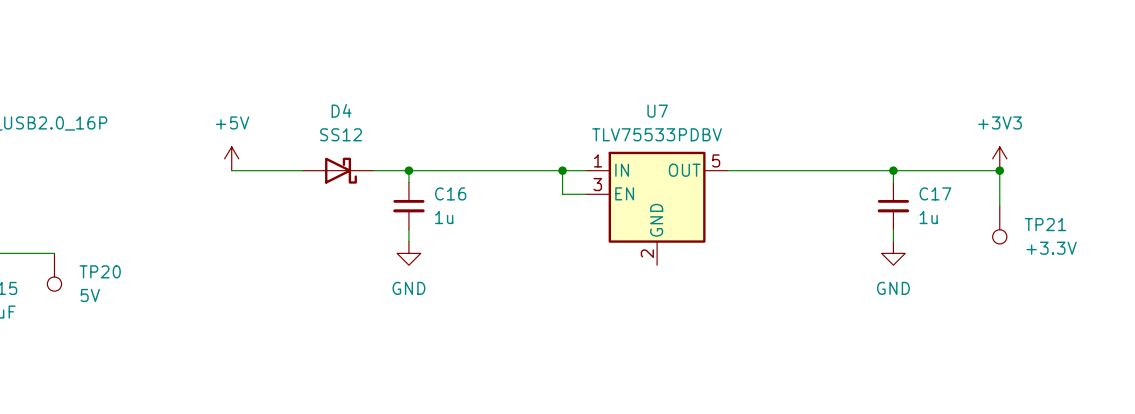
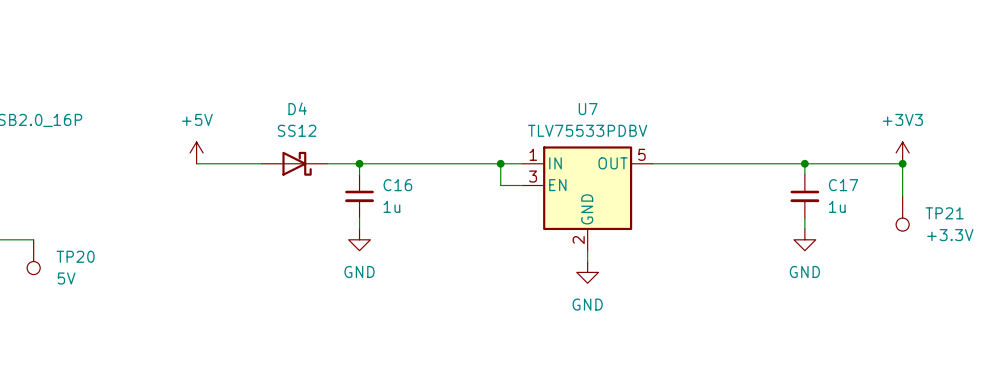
wire: none -> (587, 250) (587, 261)
power symbol: none -> GND (587, 272)

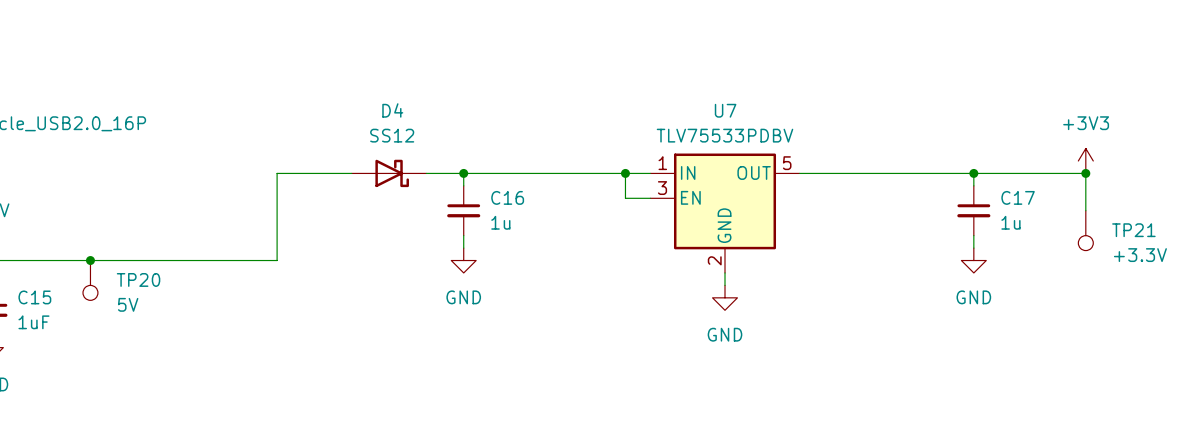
power symbol: +5V (196, 152) -> none
wire: none -> (277, 173) (277, 260) (90, 260)
junction: none -> (90, 260)

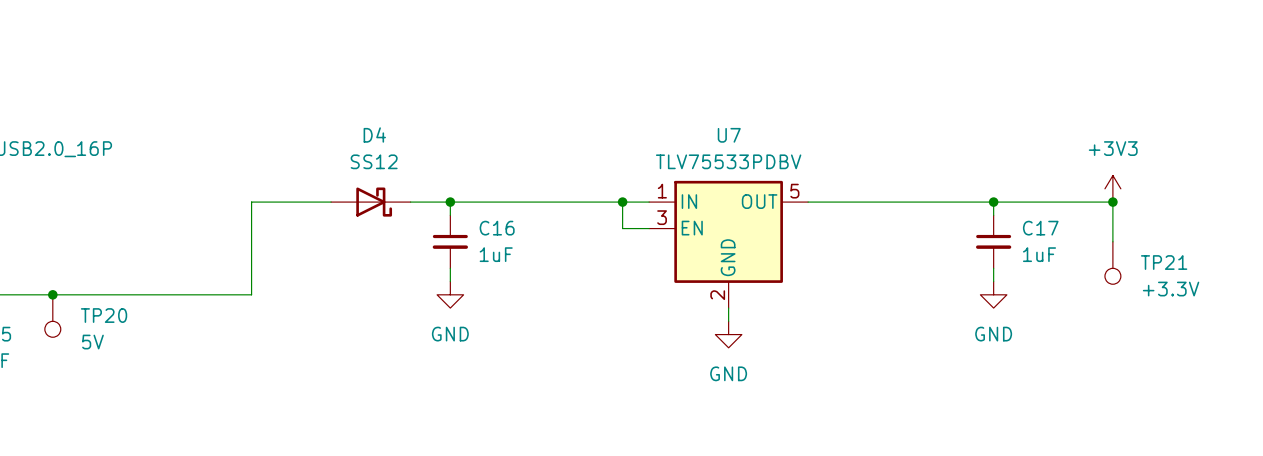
C16 value: 1u (500, 222) -> 1uF (496, 254)
C17 value: 1u (1010, 222) -> 1uF (1039, 254)

